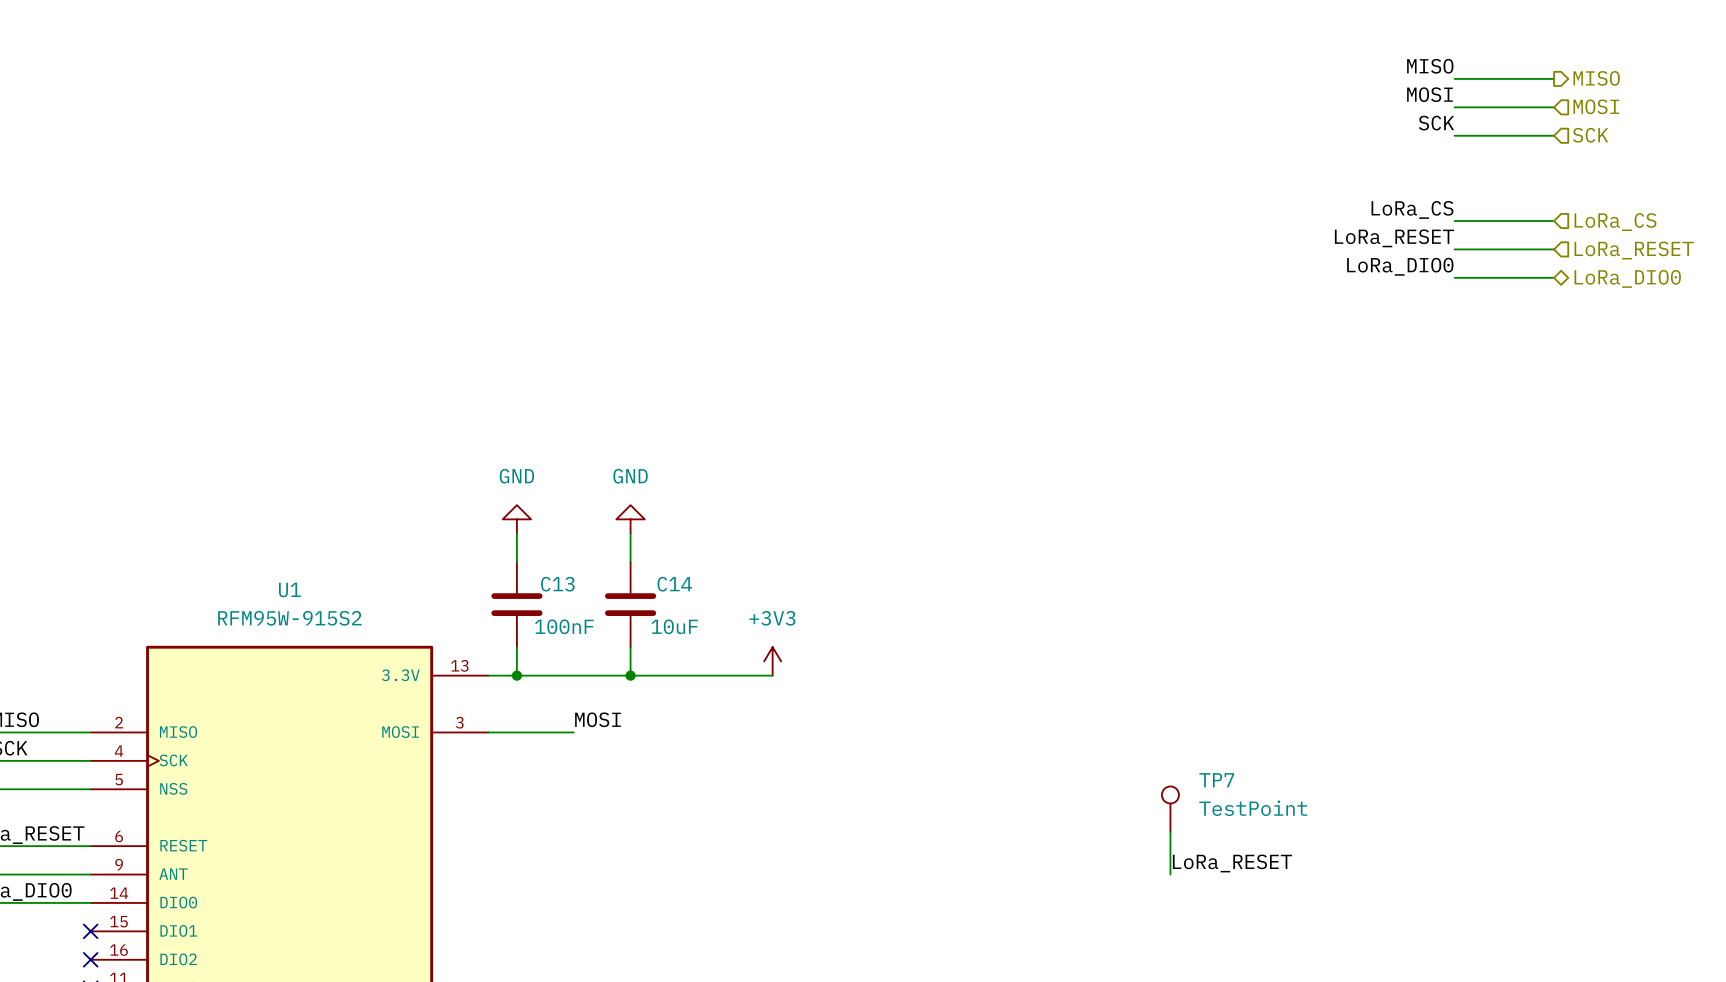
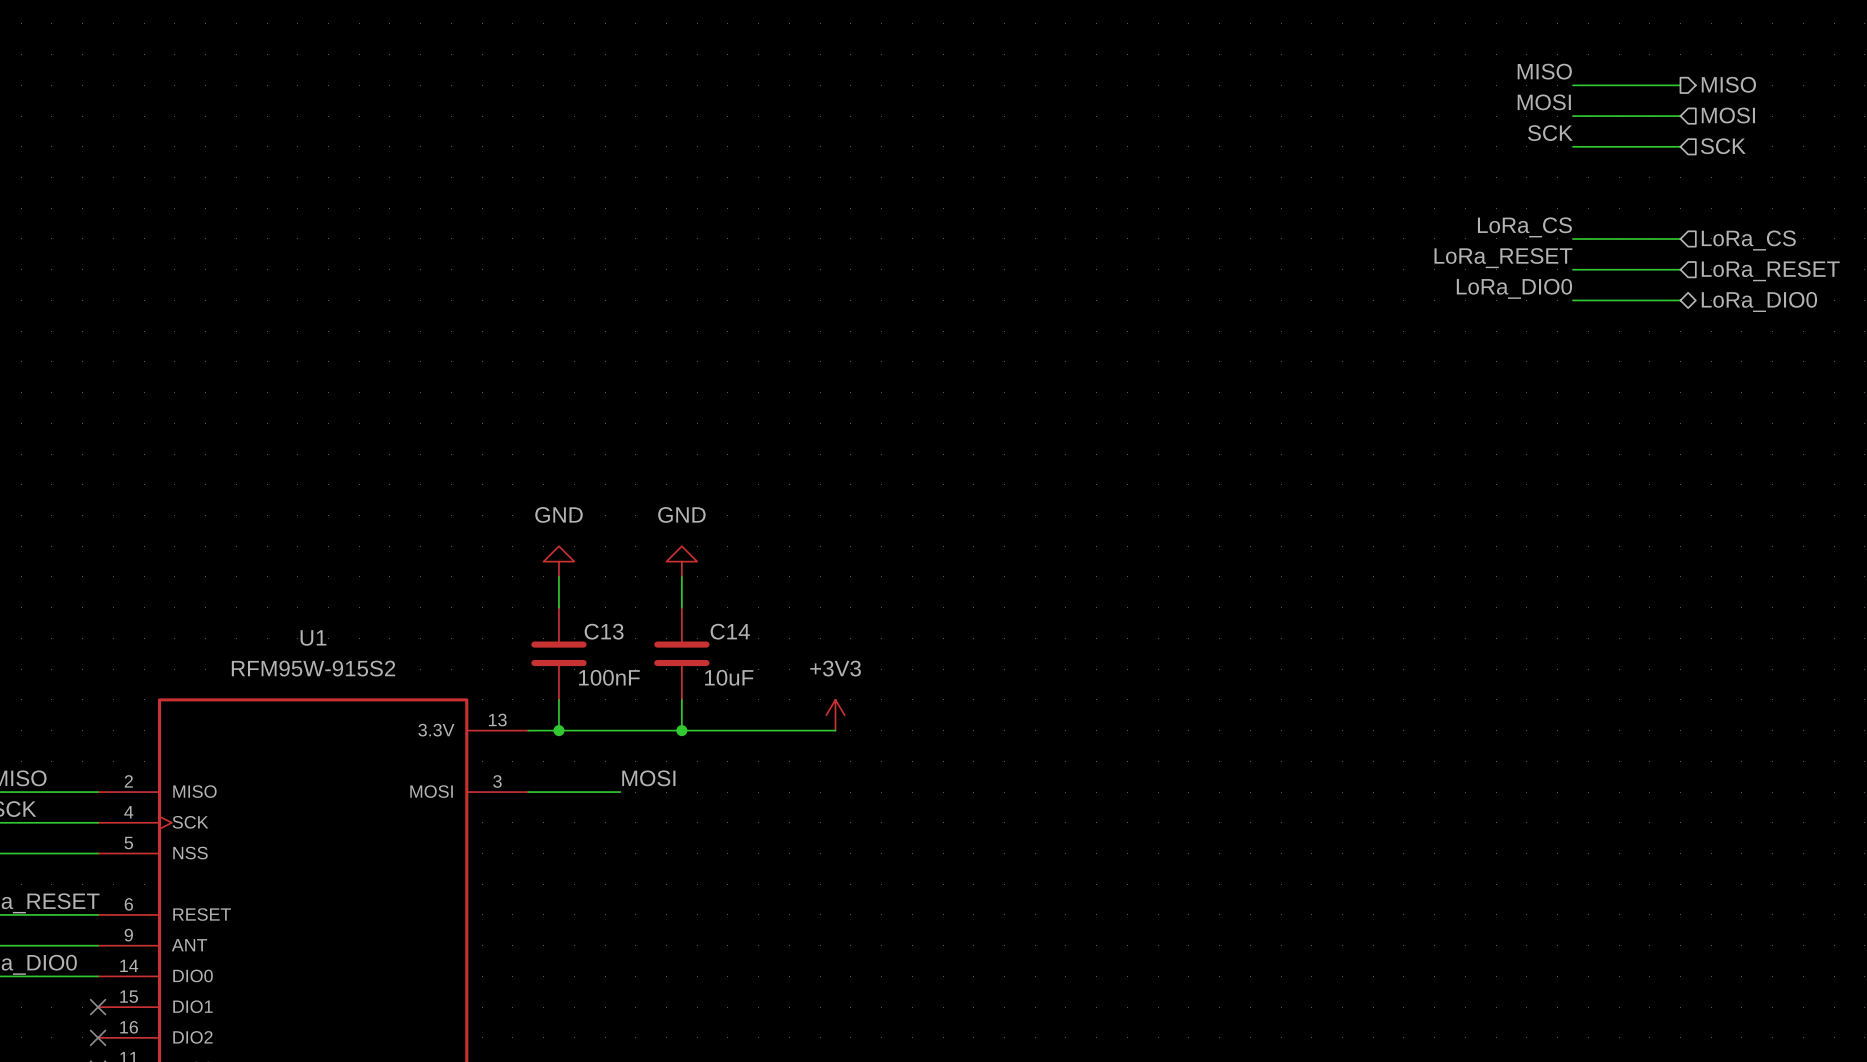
TP7: TestPoint (1170, 809) -> none
wire: (1170, 831) (1170, 874) -> none
label: LoRa_RESET (1232, 863) -> none

